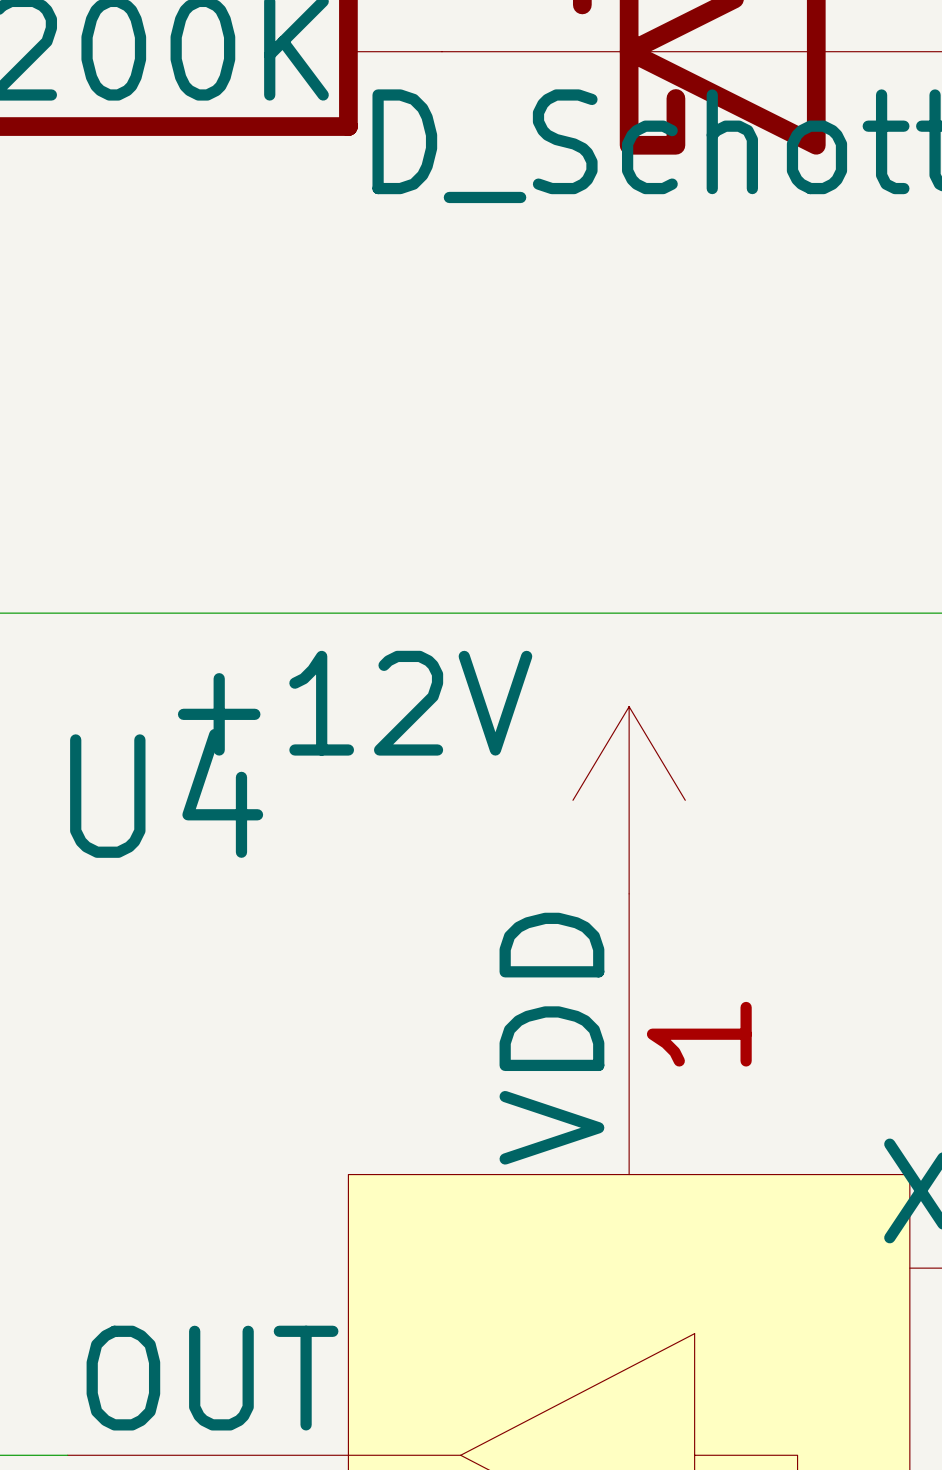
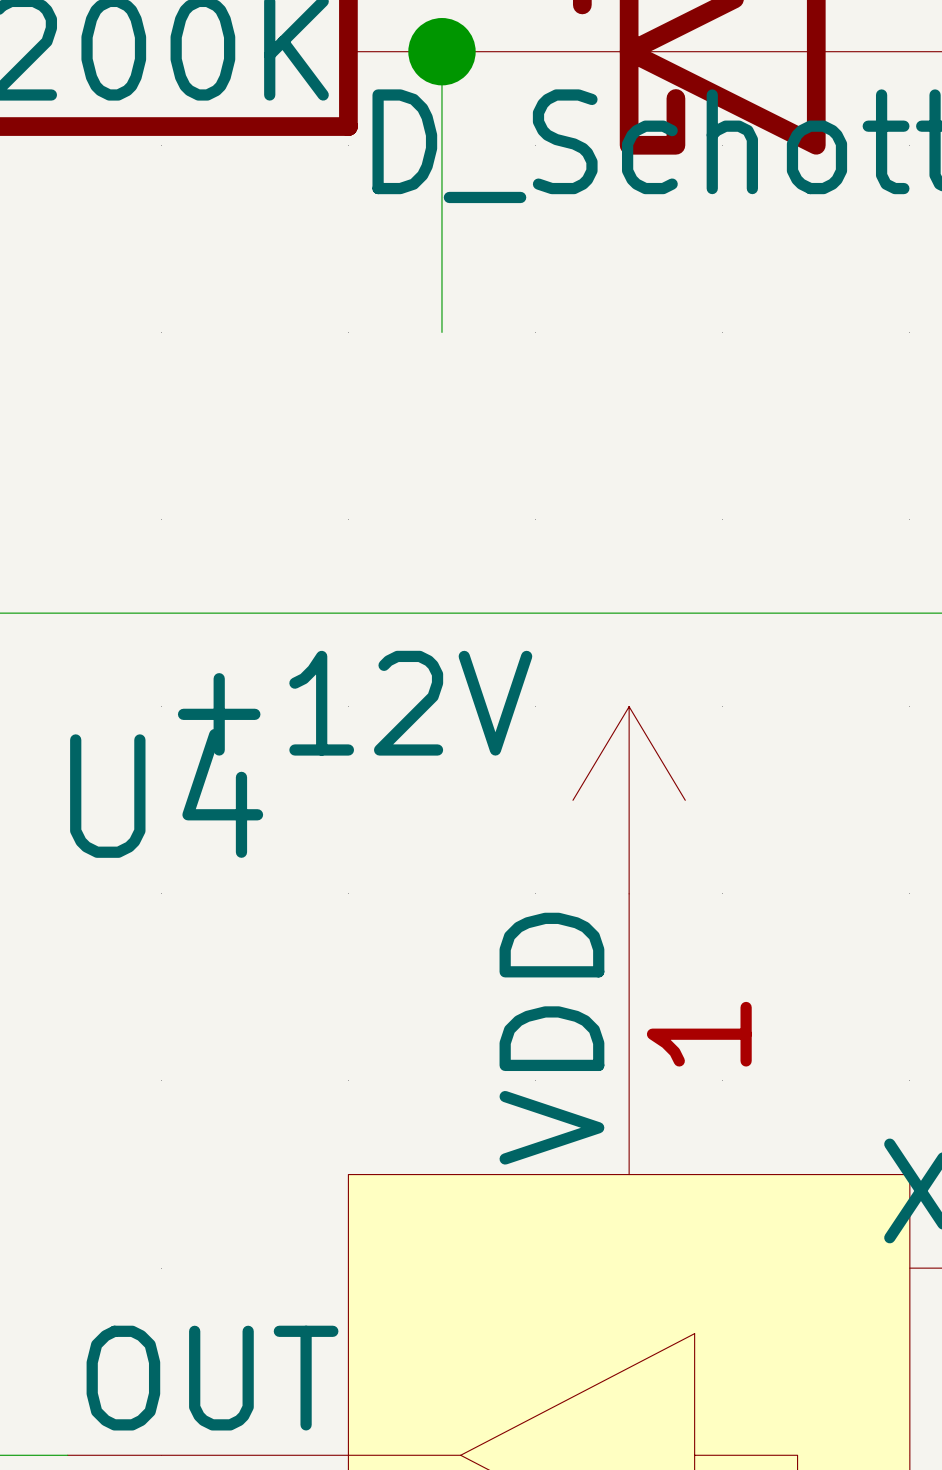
wire: none -> (441, 51) (441, 332)
junction: none -> (441, 51)

